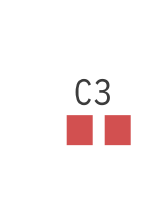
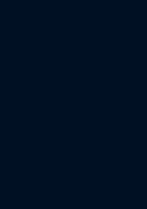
C3: (98, 130) -> none

